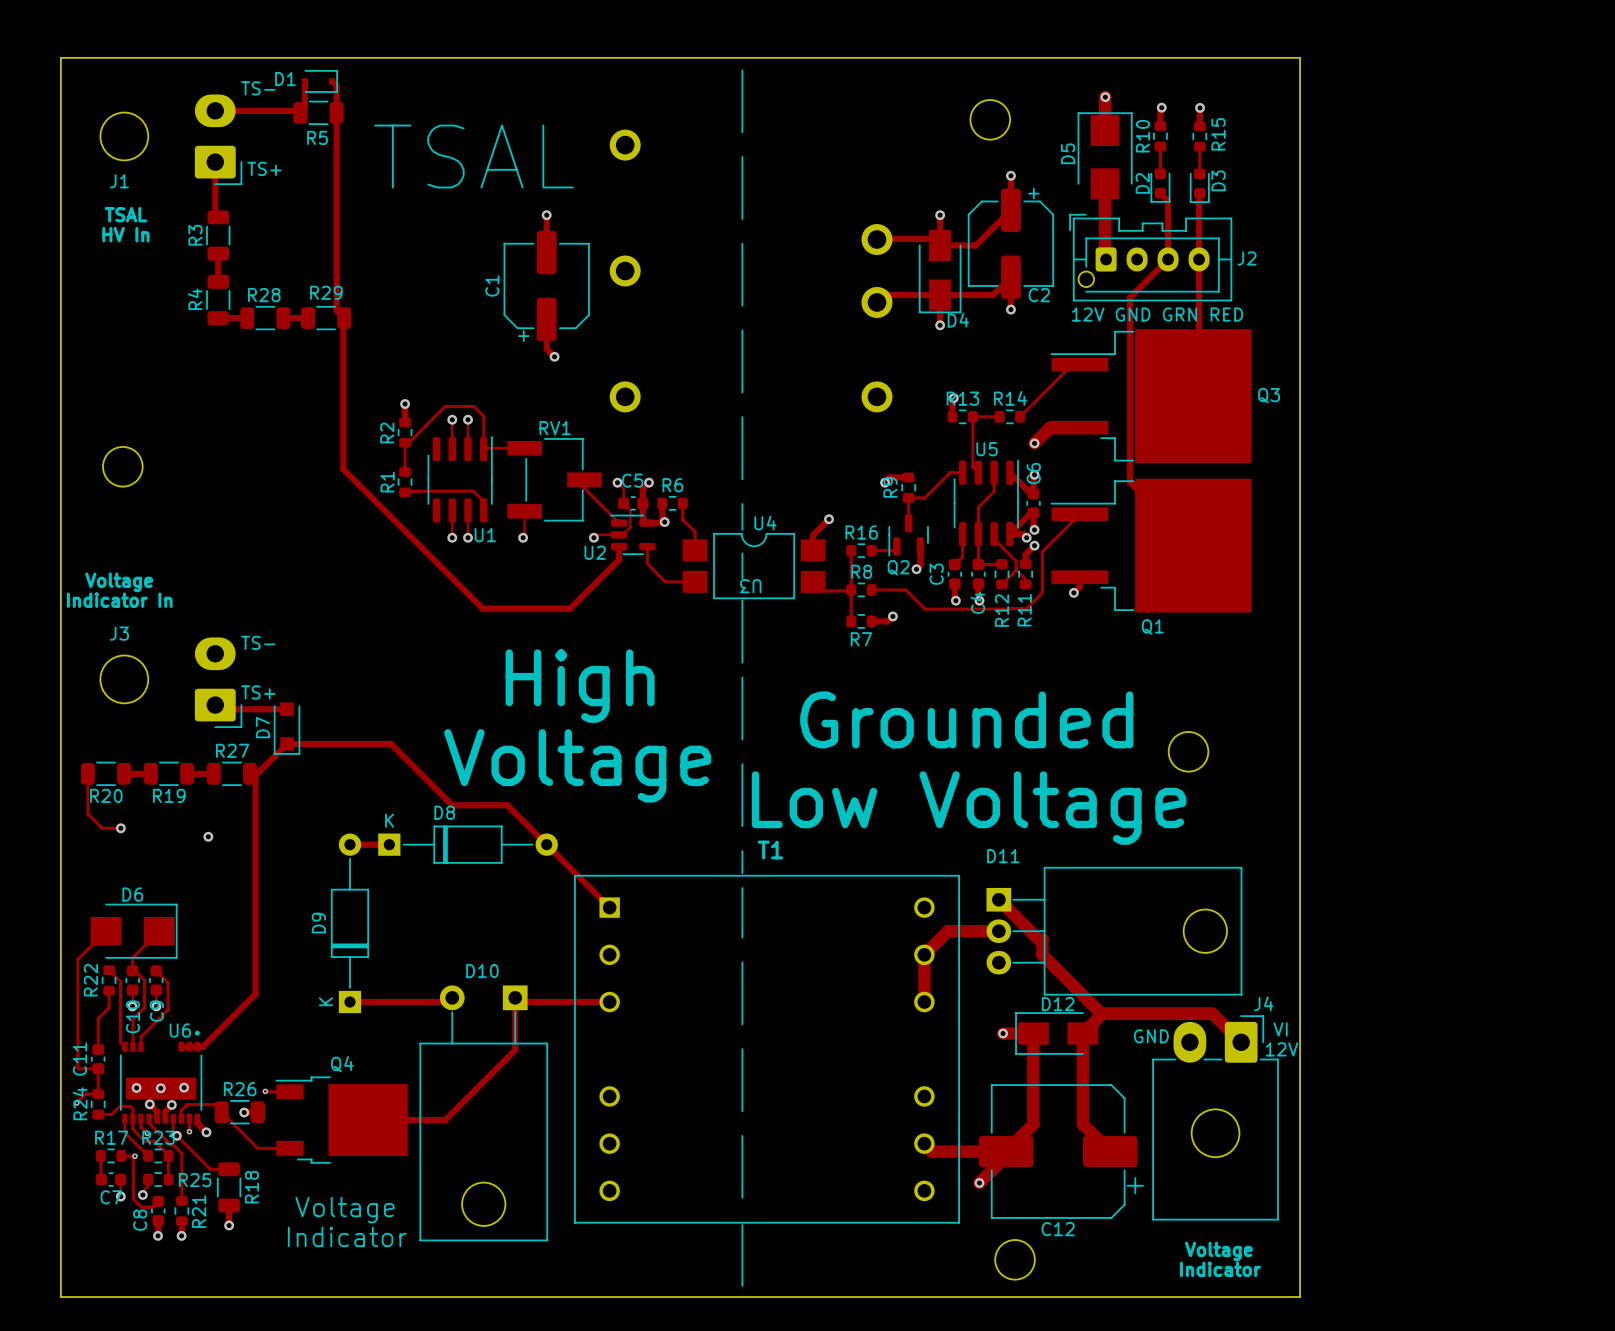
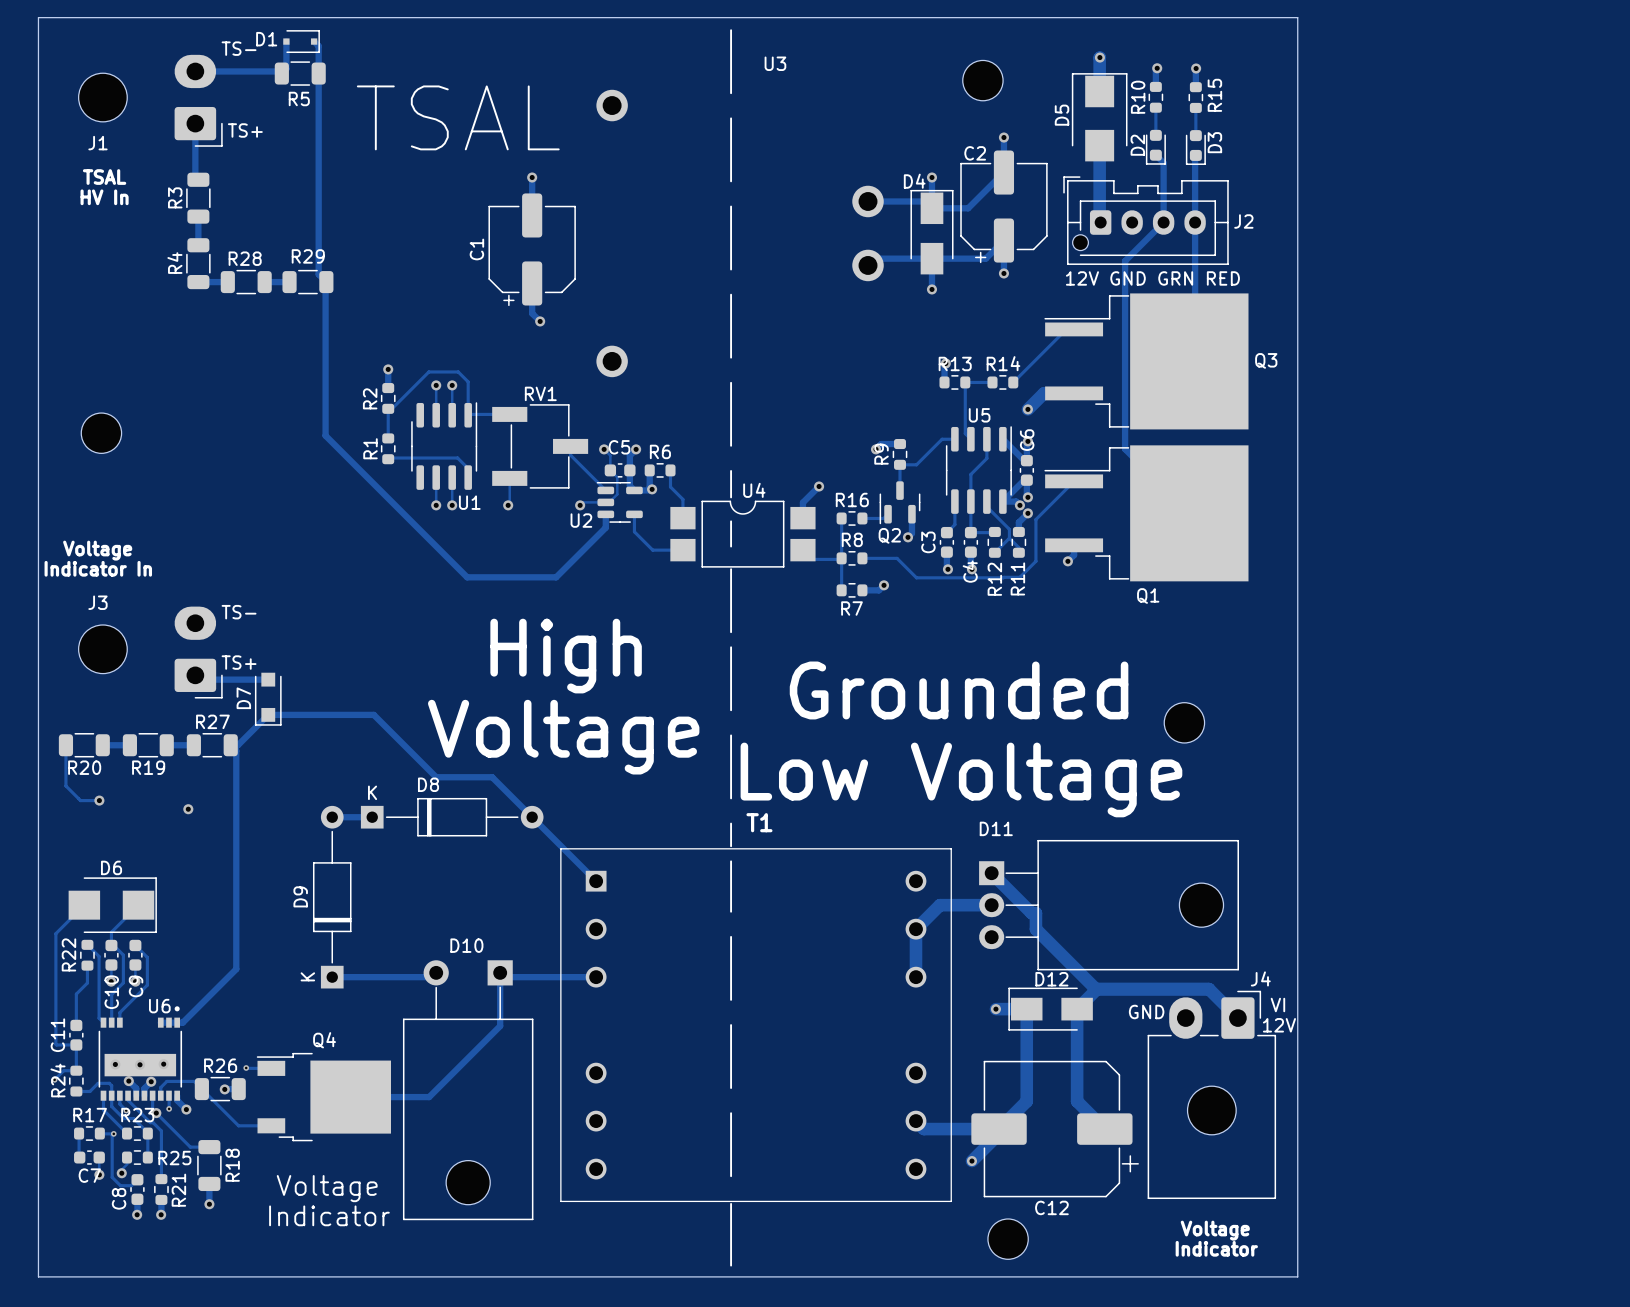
U3 footprint: [609, 129, 893, 413] -> [596, 89, 884, 378]
C2 rotation: 0° (1010, 243) -> 180° (1003, 206)
D4 rotation: 0° (940, 271) -> 180° (931, 232)
U3 name position: U3 (750, 586) -> U3 (775, 63)

